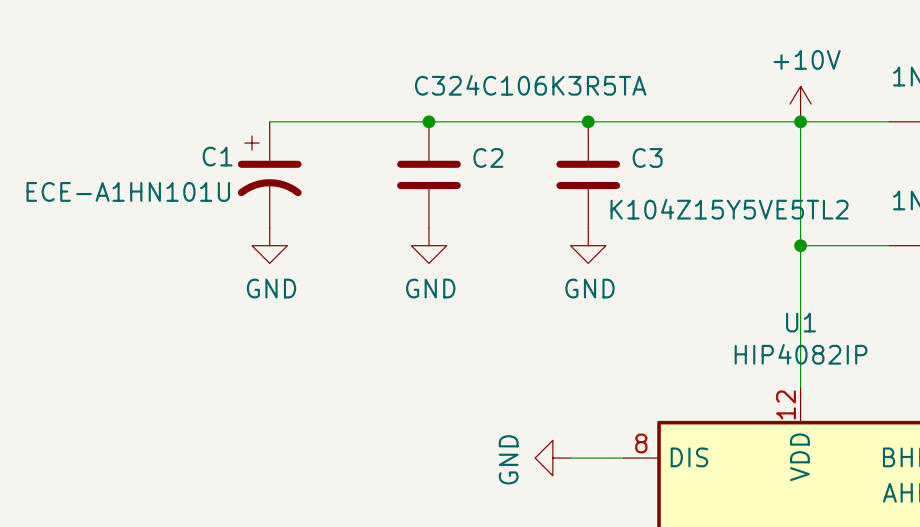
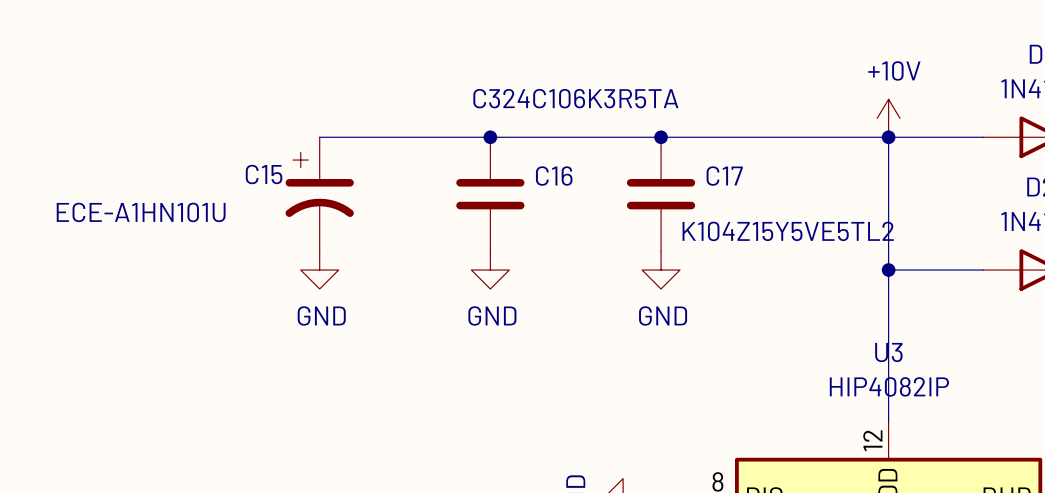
C1 name: C1 (217, 156) -> C15 (264, 174)
C2 name: C2 (488, 157) -> C16 (554, 176)
C3 name: C3 (647, 157) -> C17 (724, 176)
U1 name: U1 (801, 322) -> U3 (888, 352)

